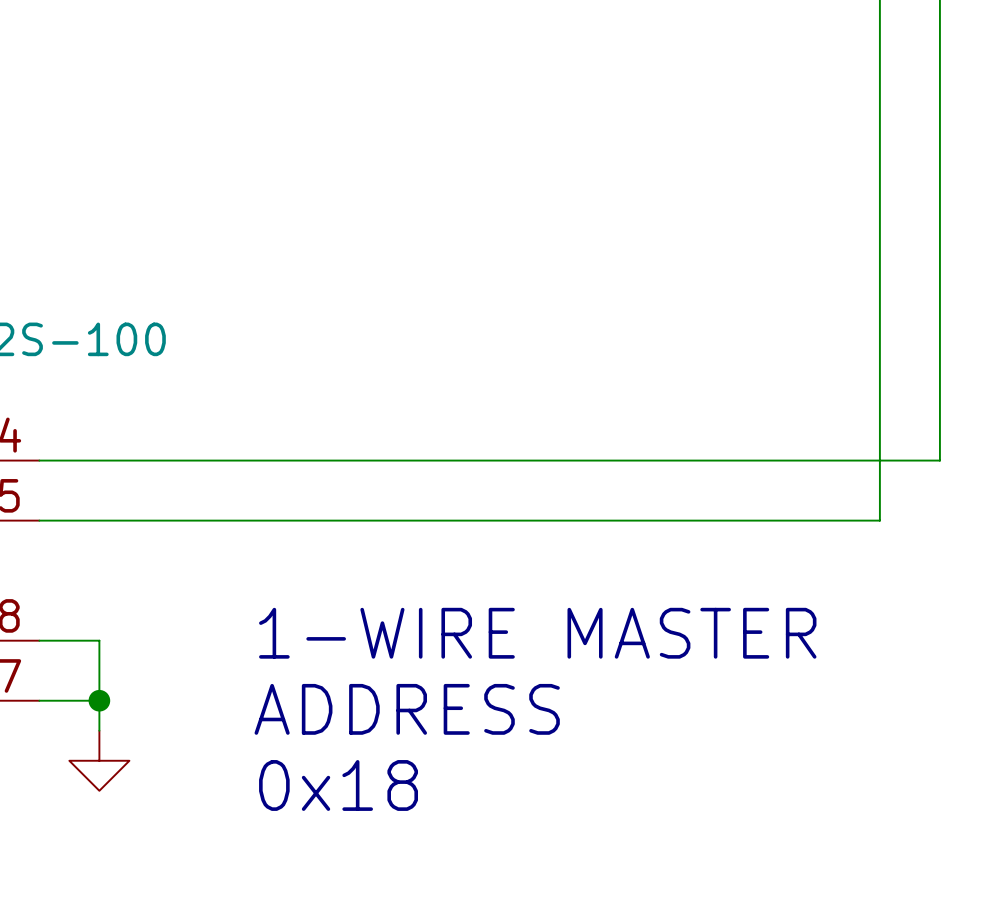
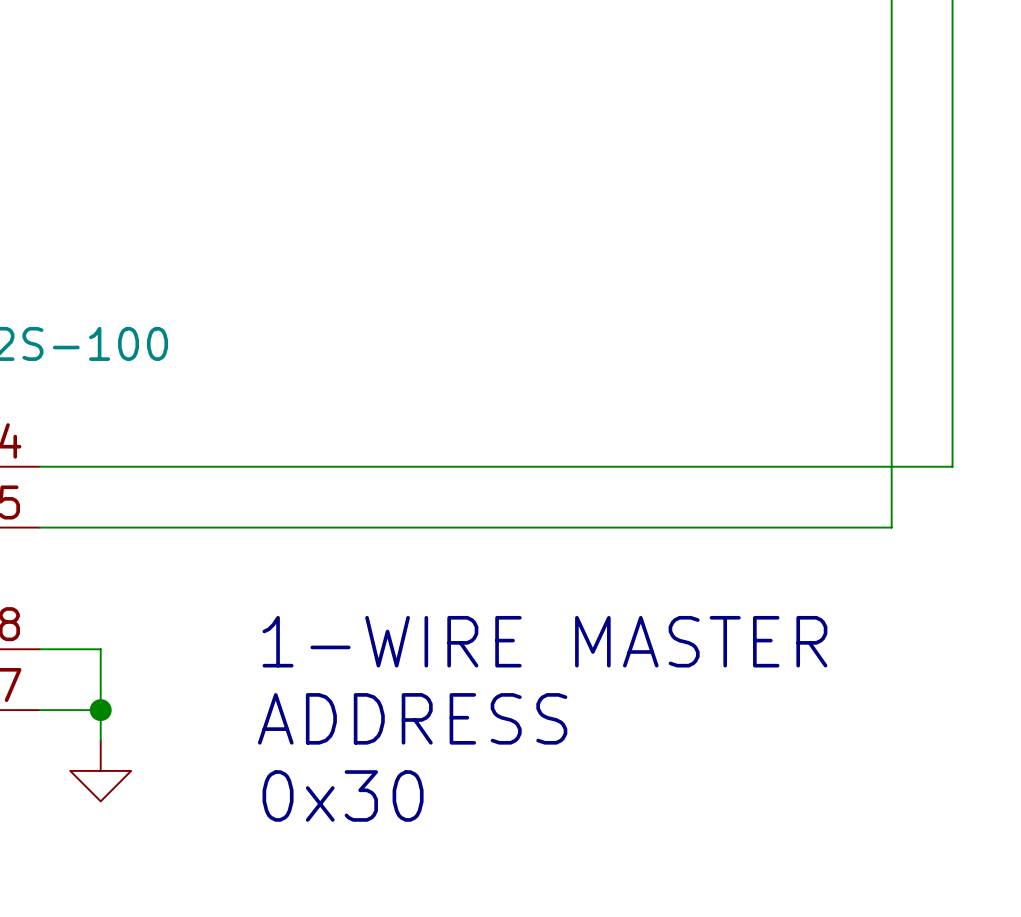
text: 0x18 (338, 785) -> 0x30 (343, 795)

